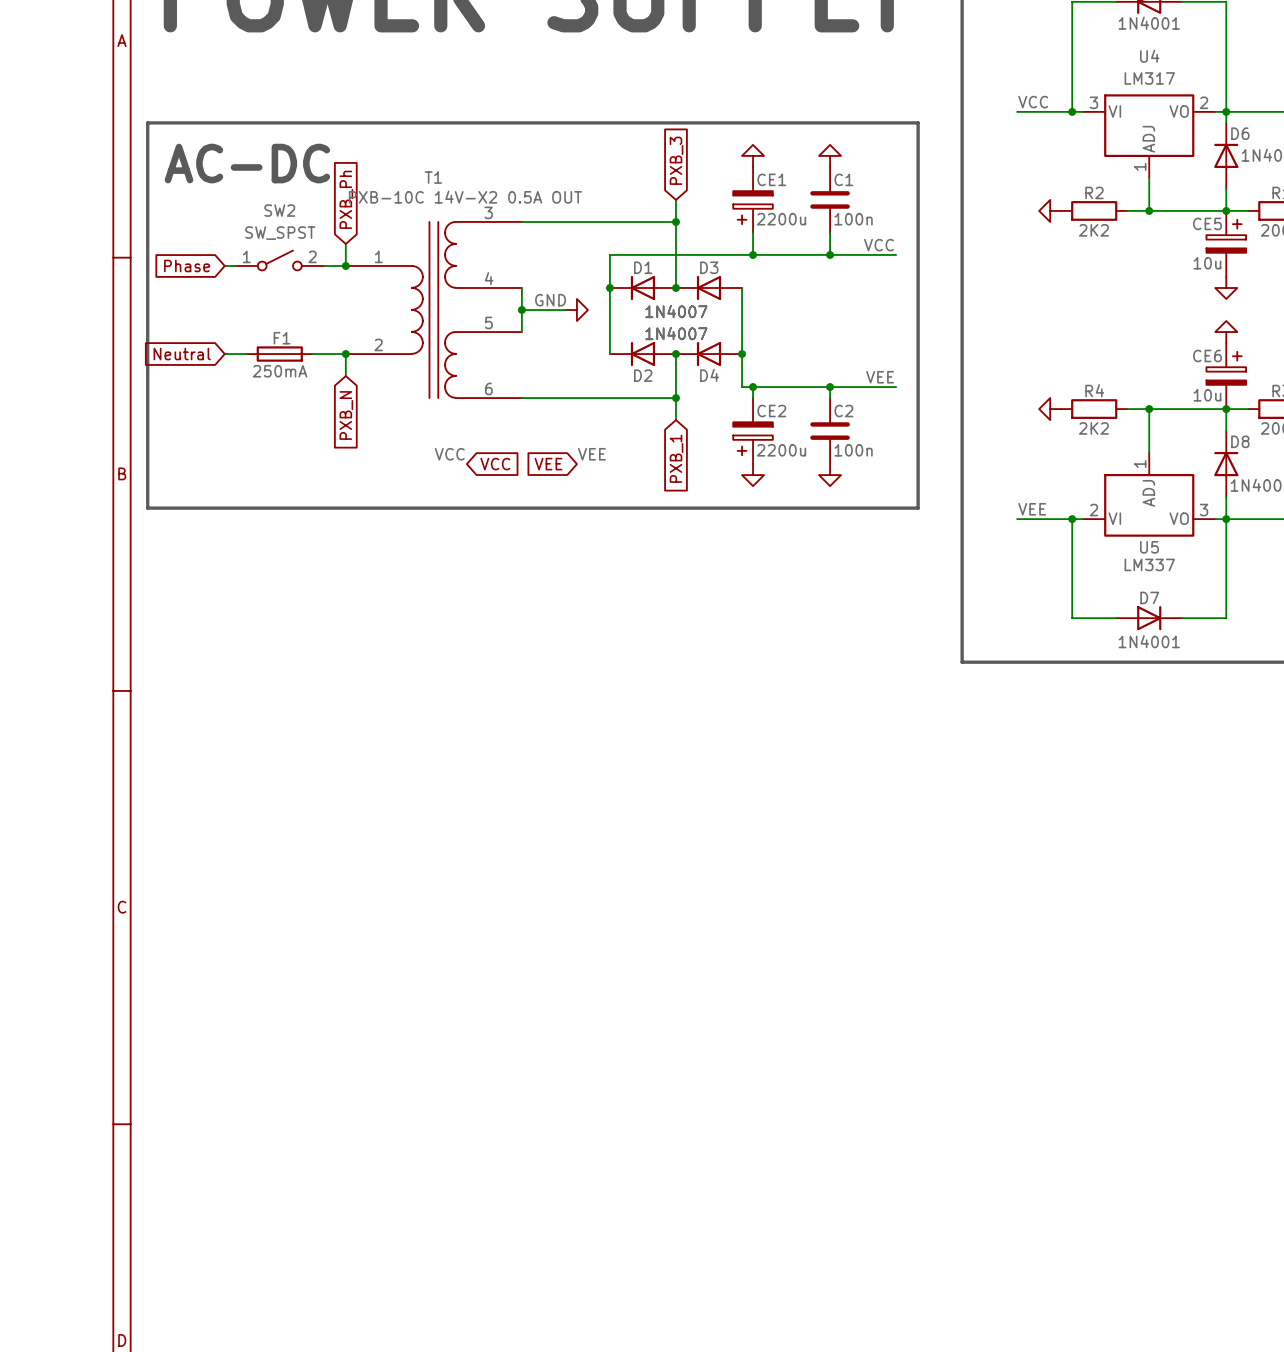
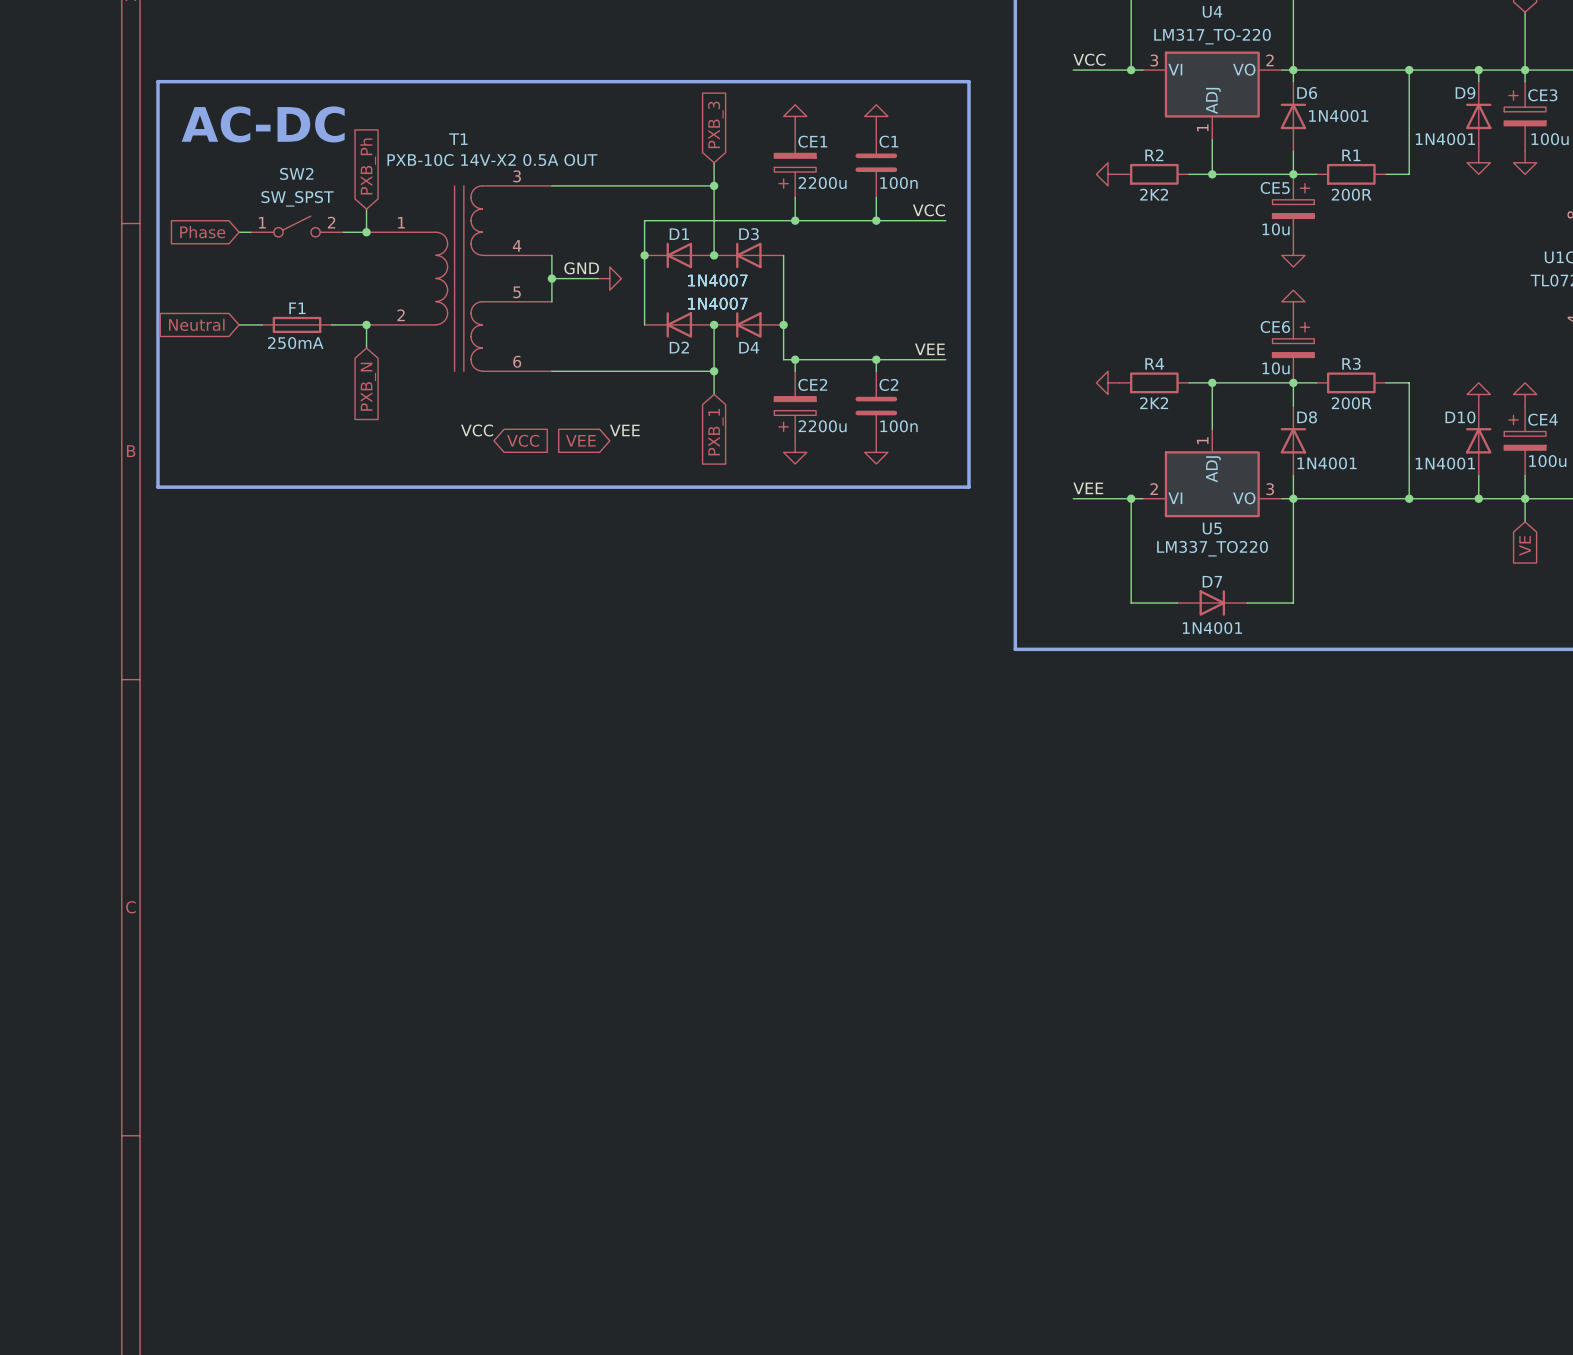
U4 value: LM317 (1149, 78) -> LM317_TO-220 (1212, 36)
U5 value: LM337 (1149, 564) -> LM337_TO220 (1212, 548)

